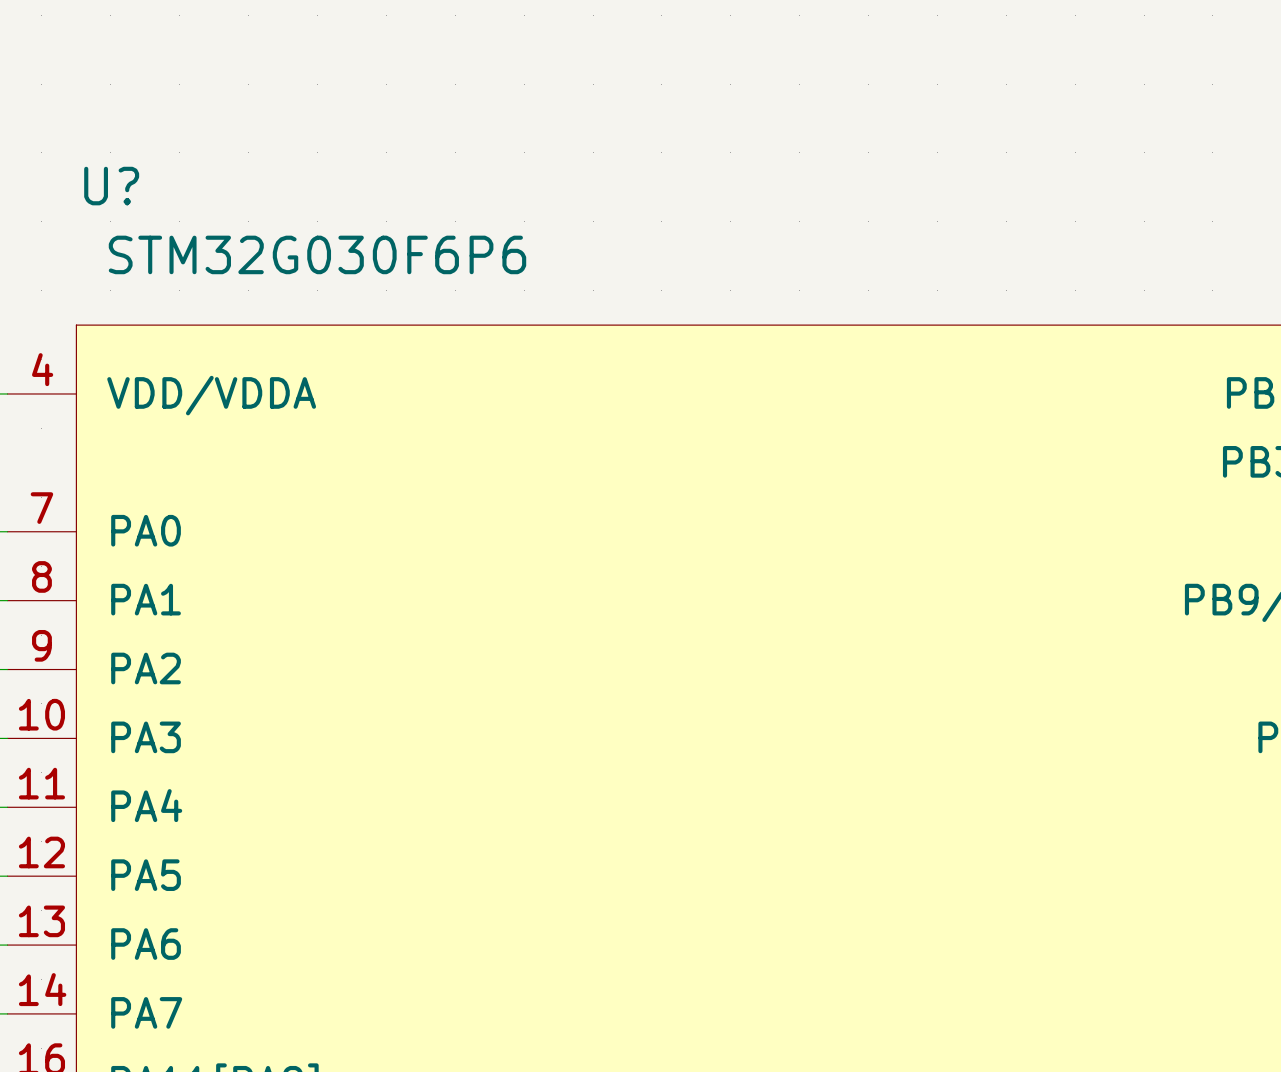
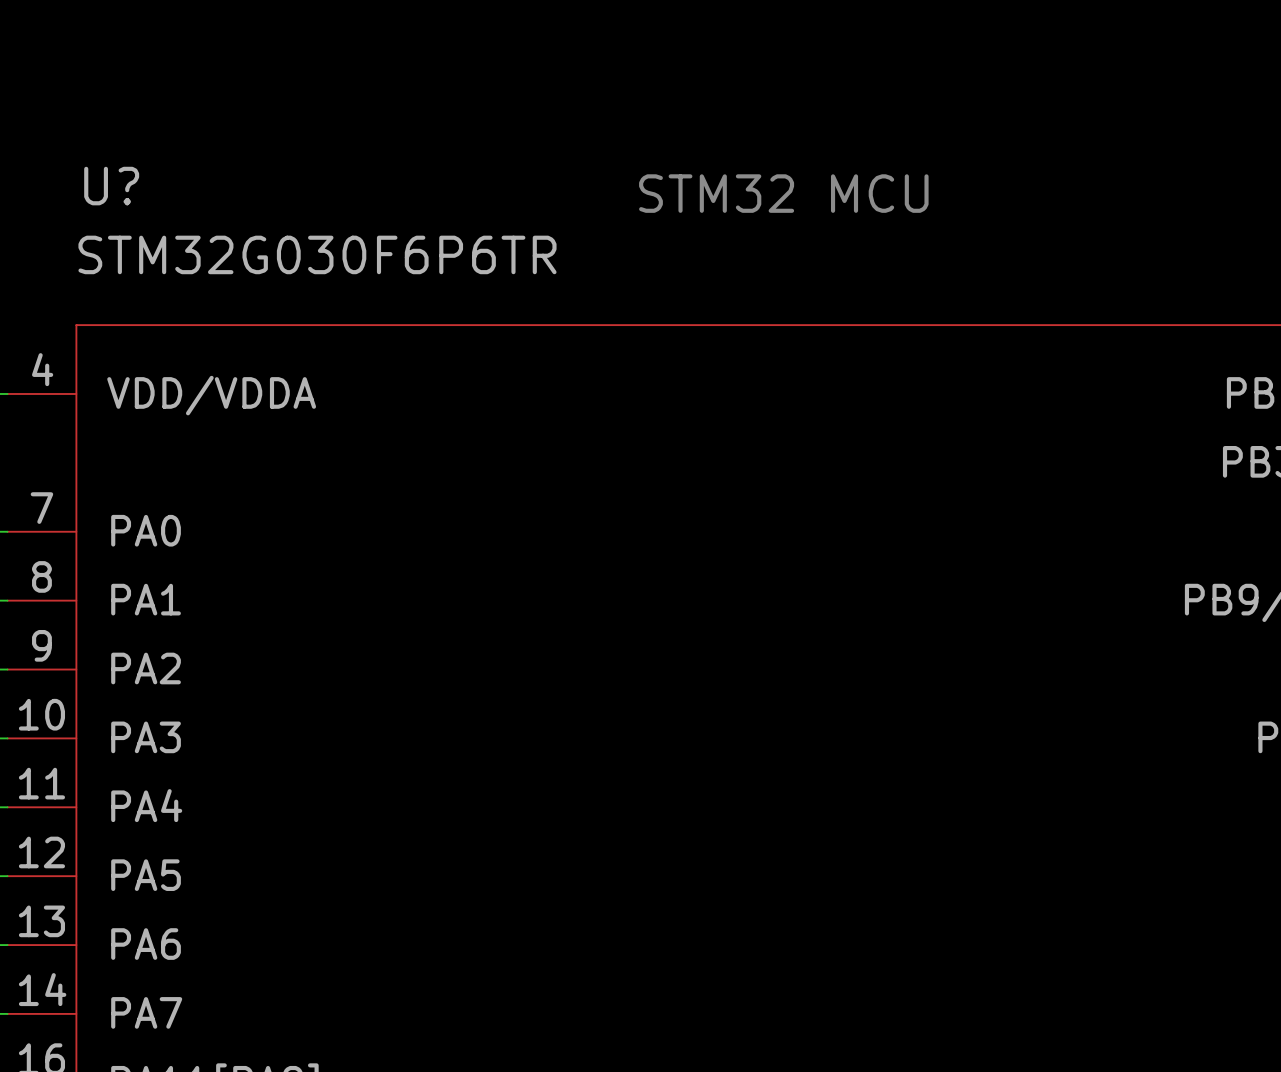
text: none -> STM32 MCU (783, 193)
U? value: STM32G030F6P6 (317, 254) -> STM32G030F6P6TR (317, 254)

